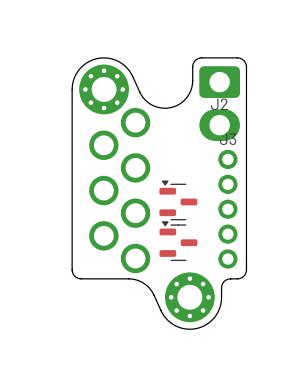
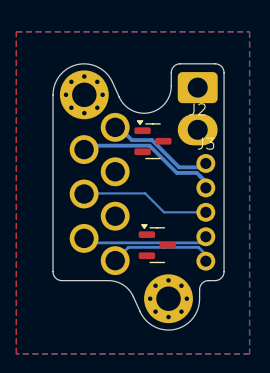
top zone outline: none -> (16, 31) (249, 31) (249, 353) (16, 353) (16, 31)
bottom track: none -> (115, 127) (119, 127) (131, 140) (151, 140) (179, 167) (201, 167) (205, 163)
bottom track: none -> (84, 149) (87, 145) (149, 145) (176, 172) (196, 172) (205, 181) (205, 187)
bottom track: none -> (84, 193) (145, 193) (164, 212) (205, 212)
part position: (178, 200) -> (152, 139)
bottom track: none -> (205, 236) (199, 242) (88, 242) (84, 238)
bottom track: none -> (115, 260) (128, 247) (198, 247) (205, 254) (205, 261)

